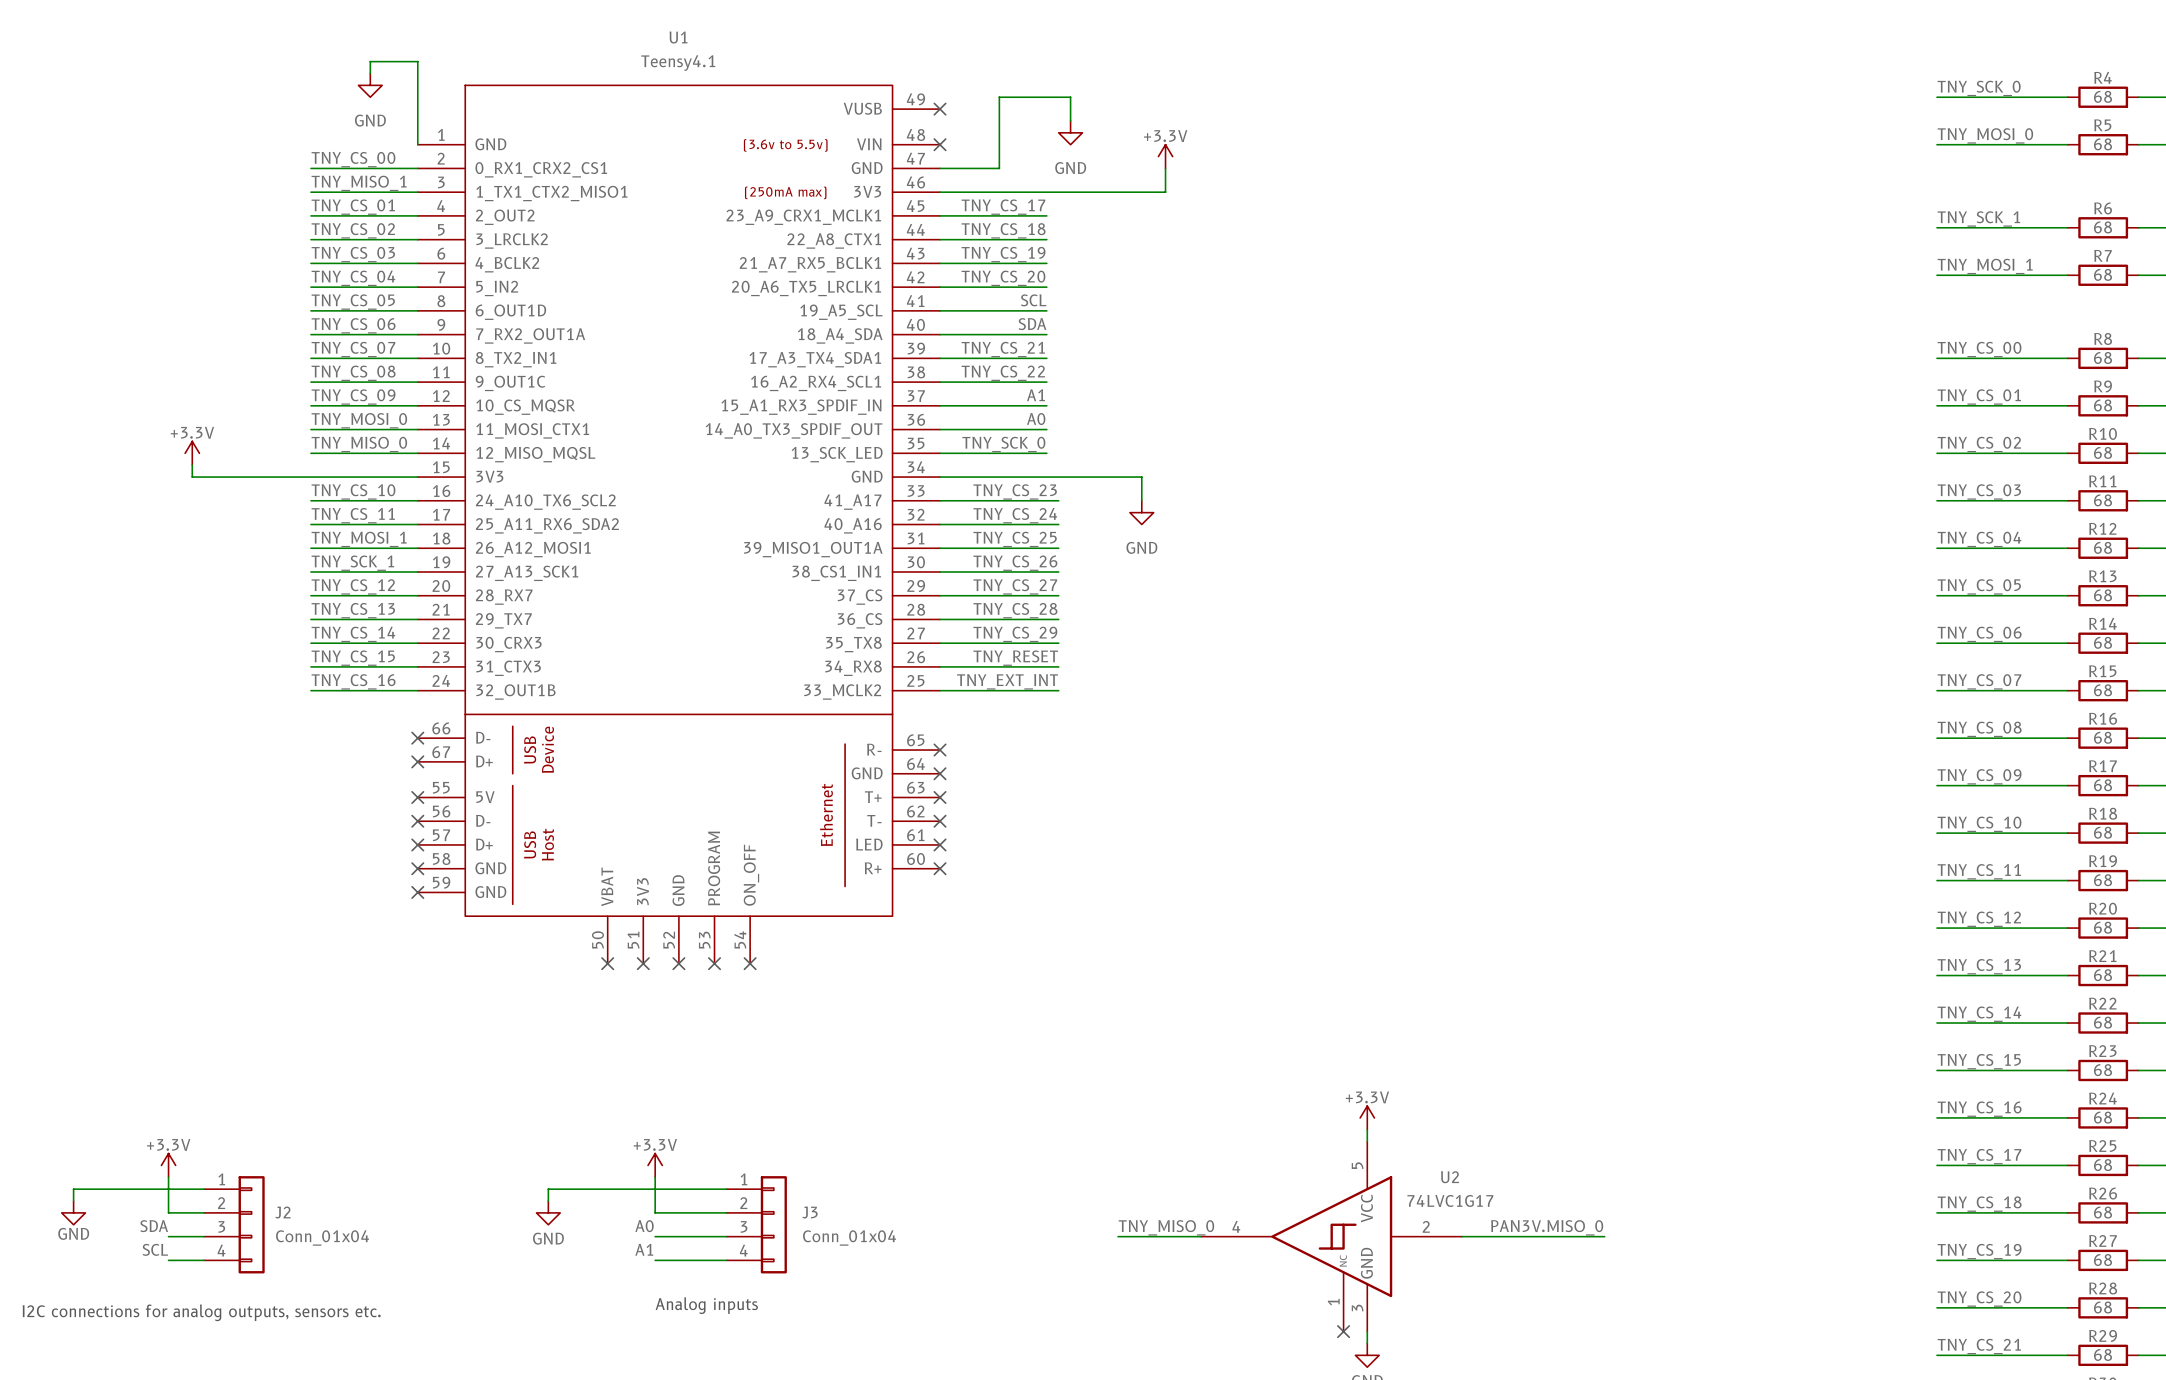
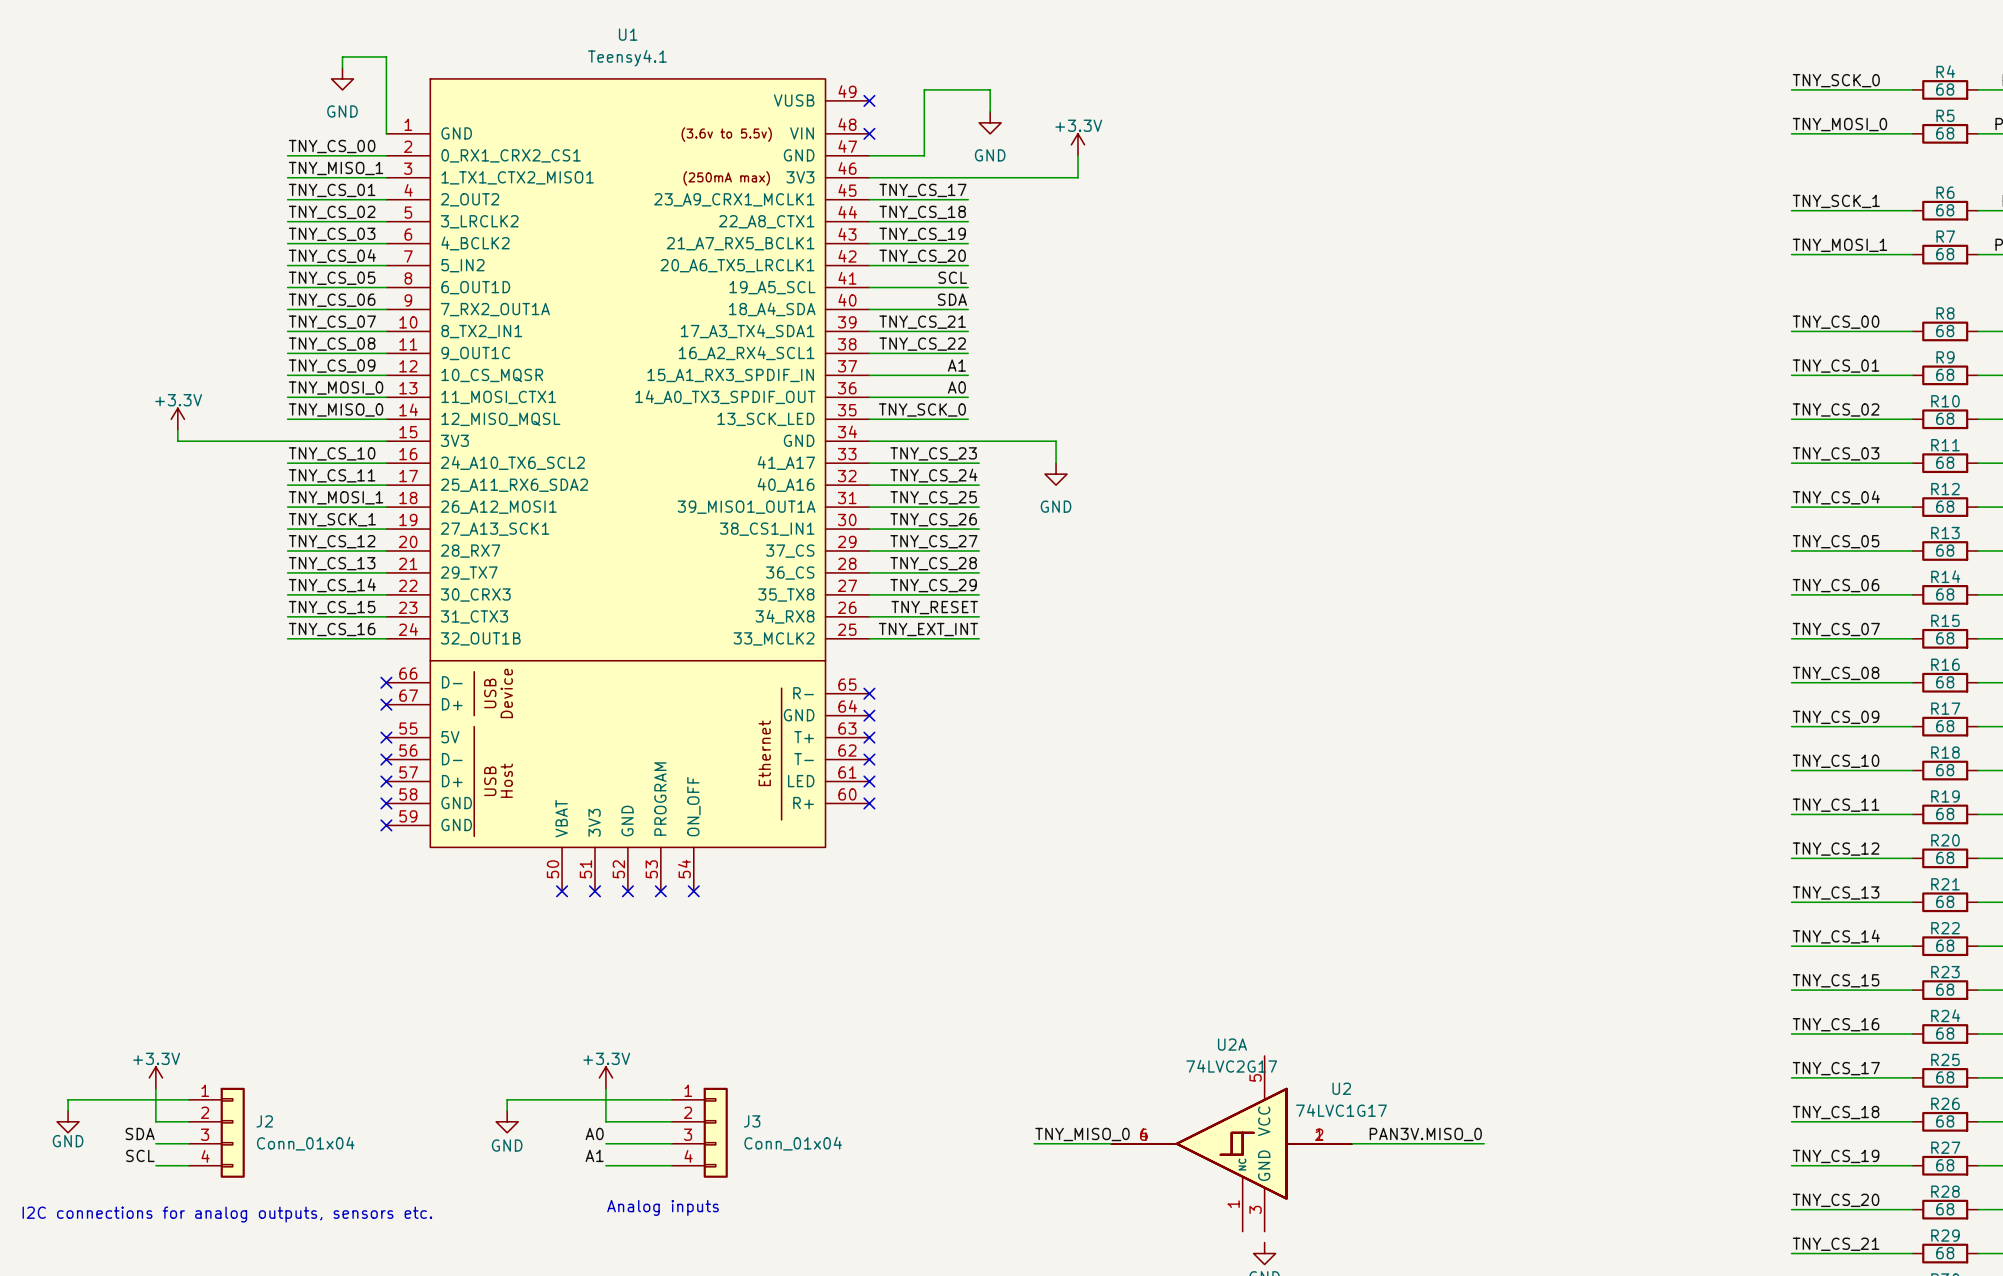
power symbol: +3.3V (1367, 1117) -> none
wire: (1367, 1129) (1367, 1141) -> none
U2A: none -> 74LVC2G17 (1231, 1143)
no-connect mark: (1343, 1331) -> none
wire: (1367, 1331) (1367, 1343) -> none

